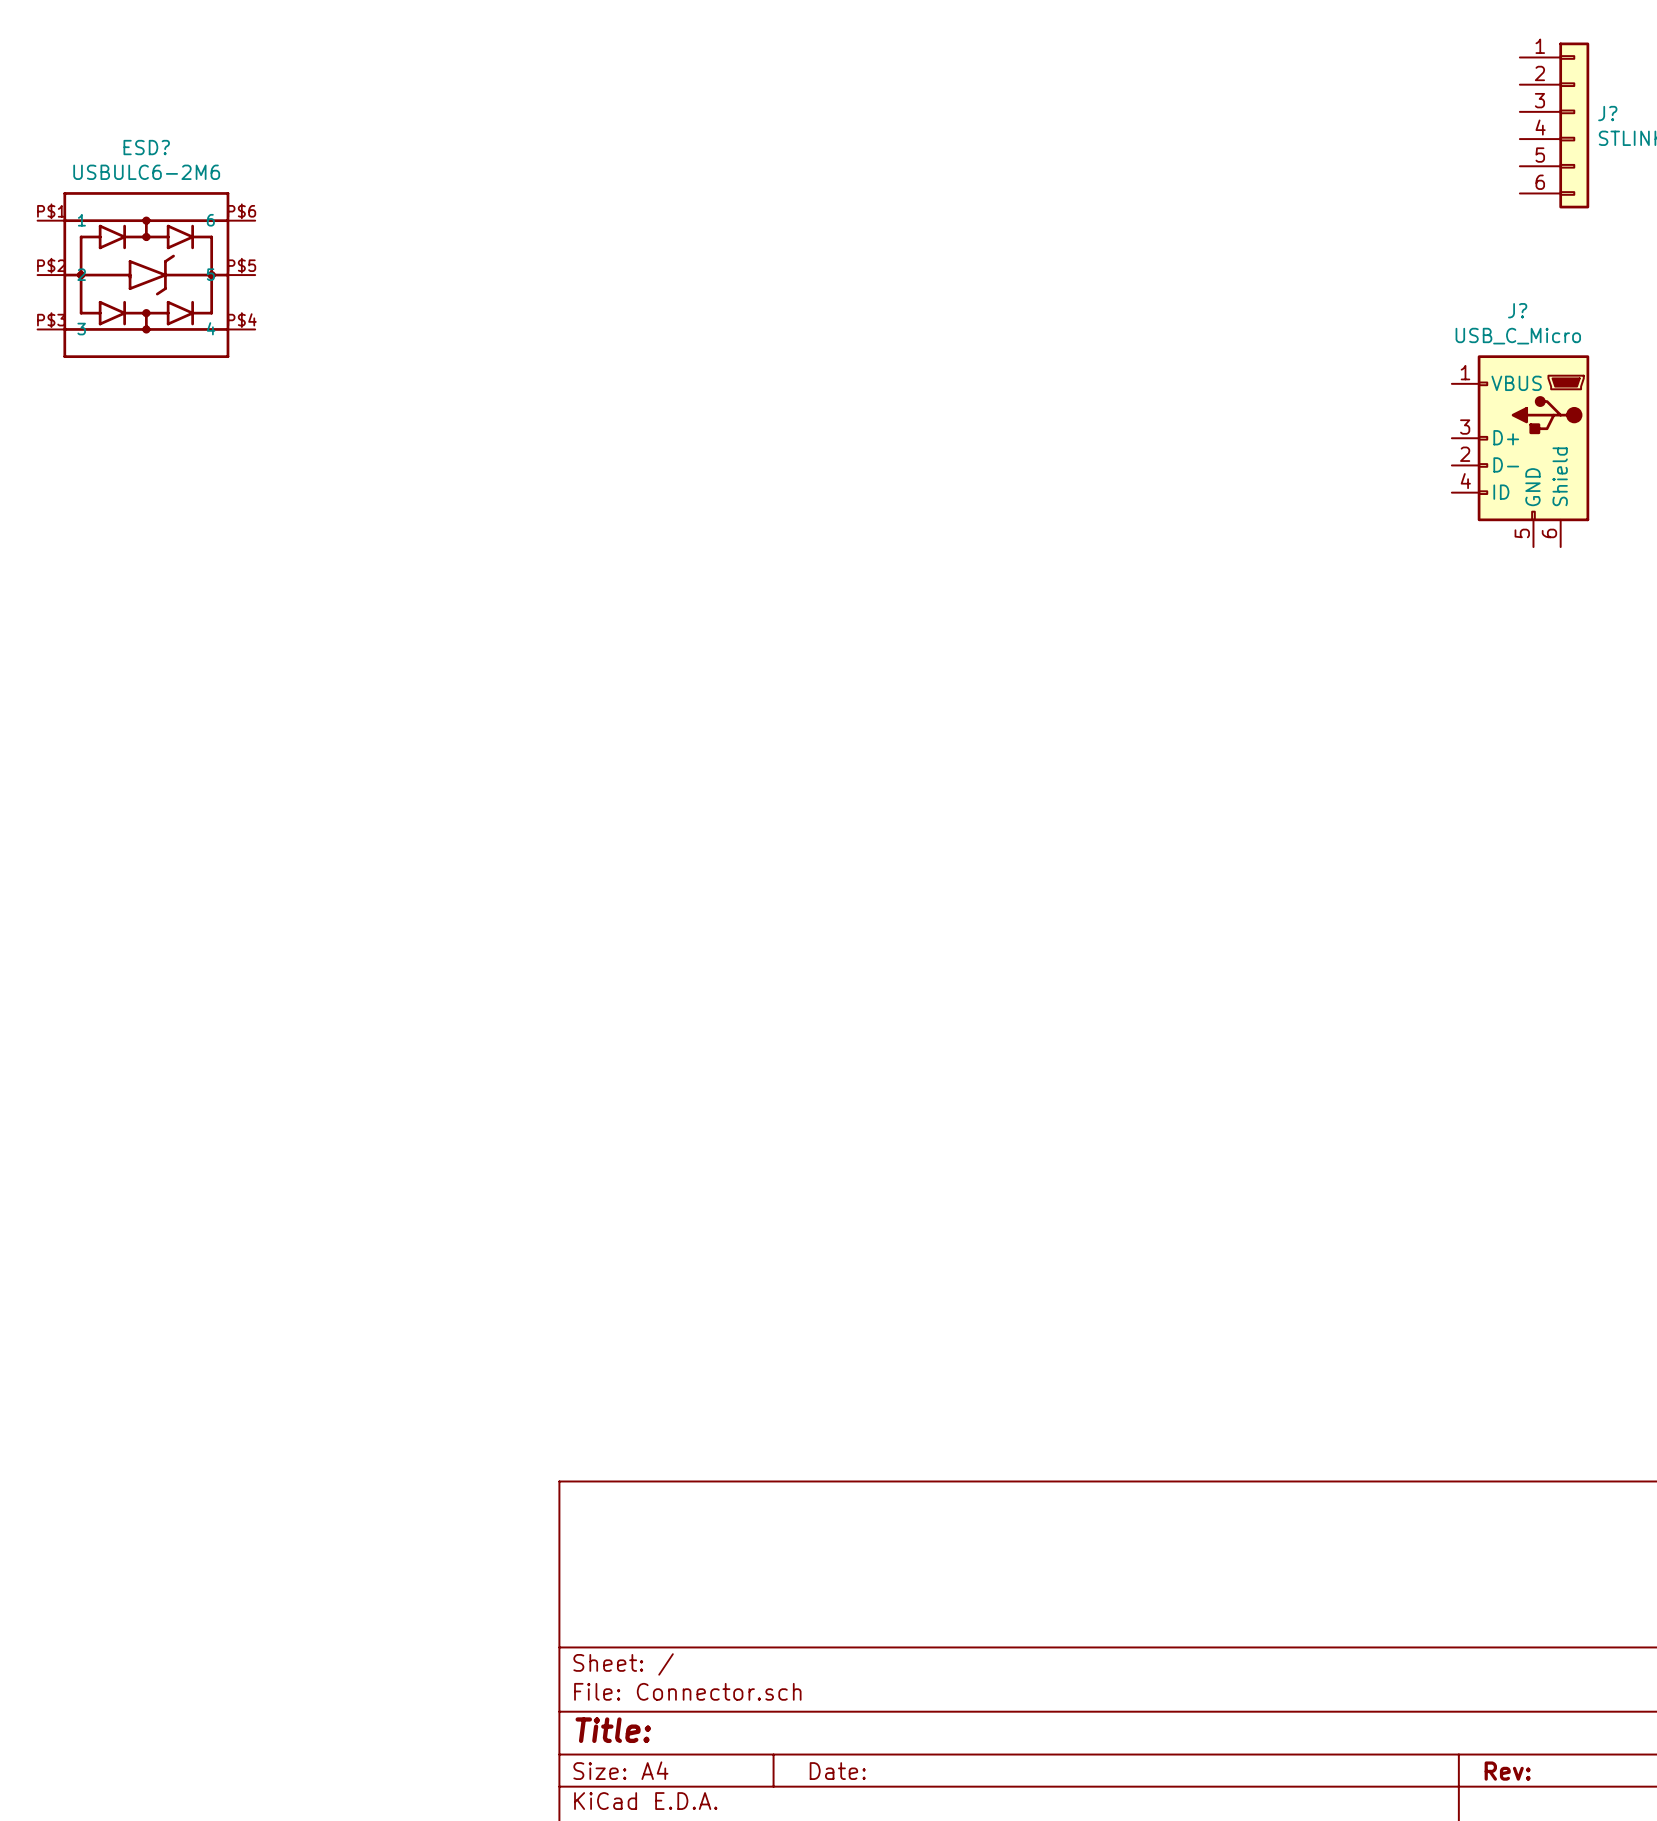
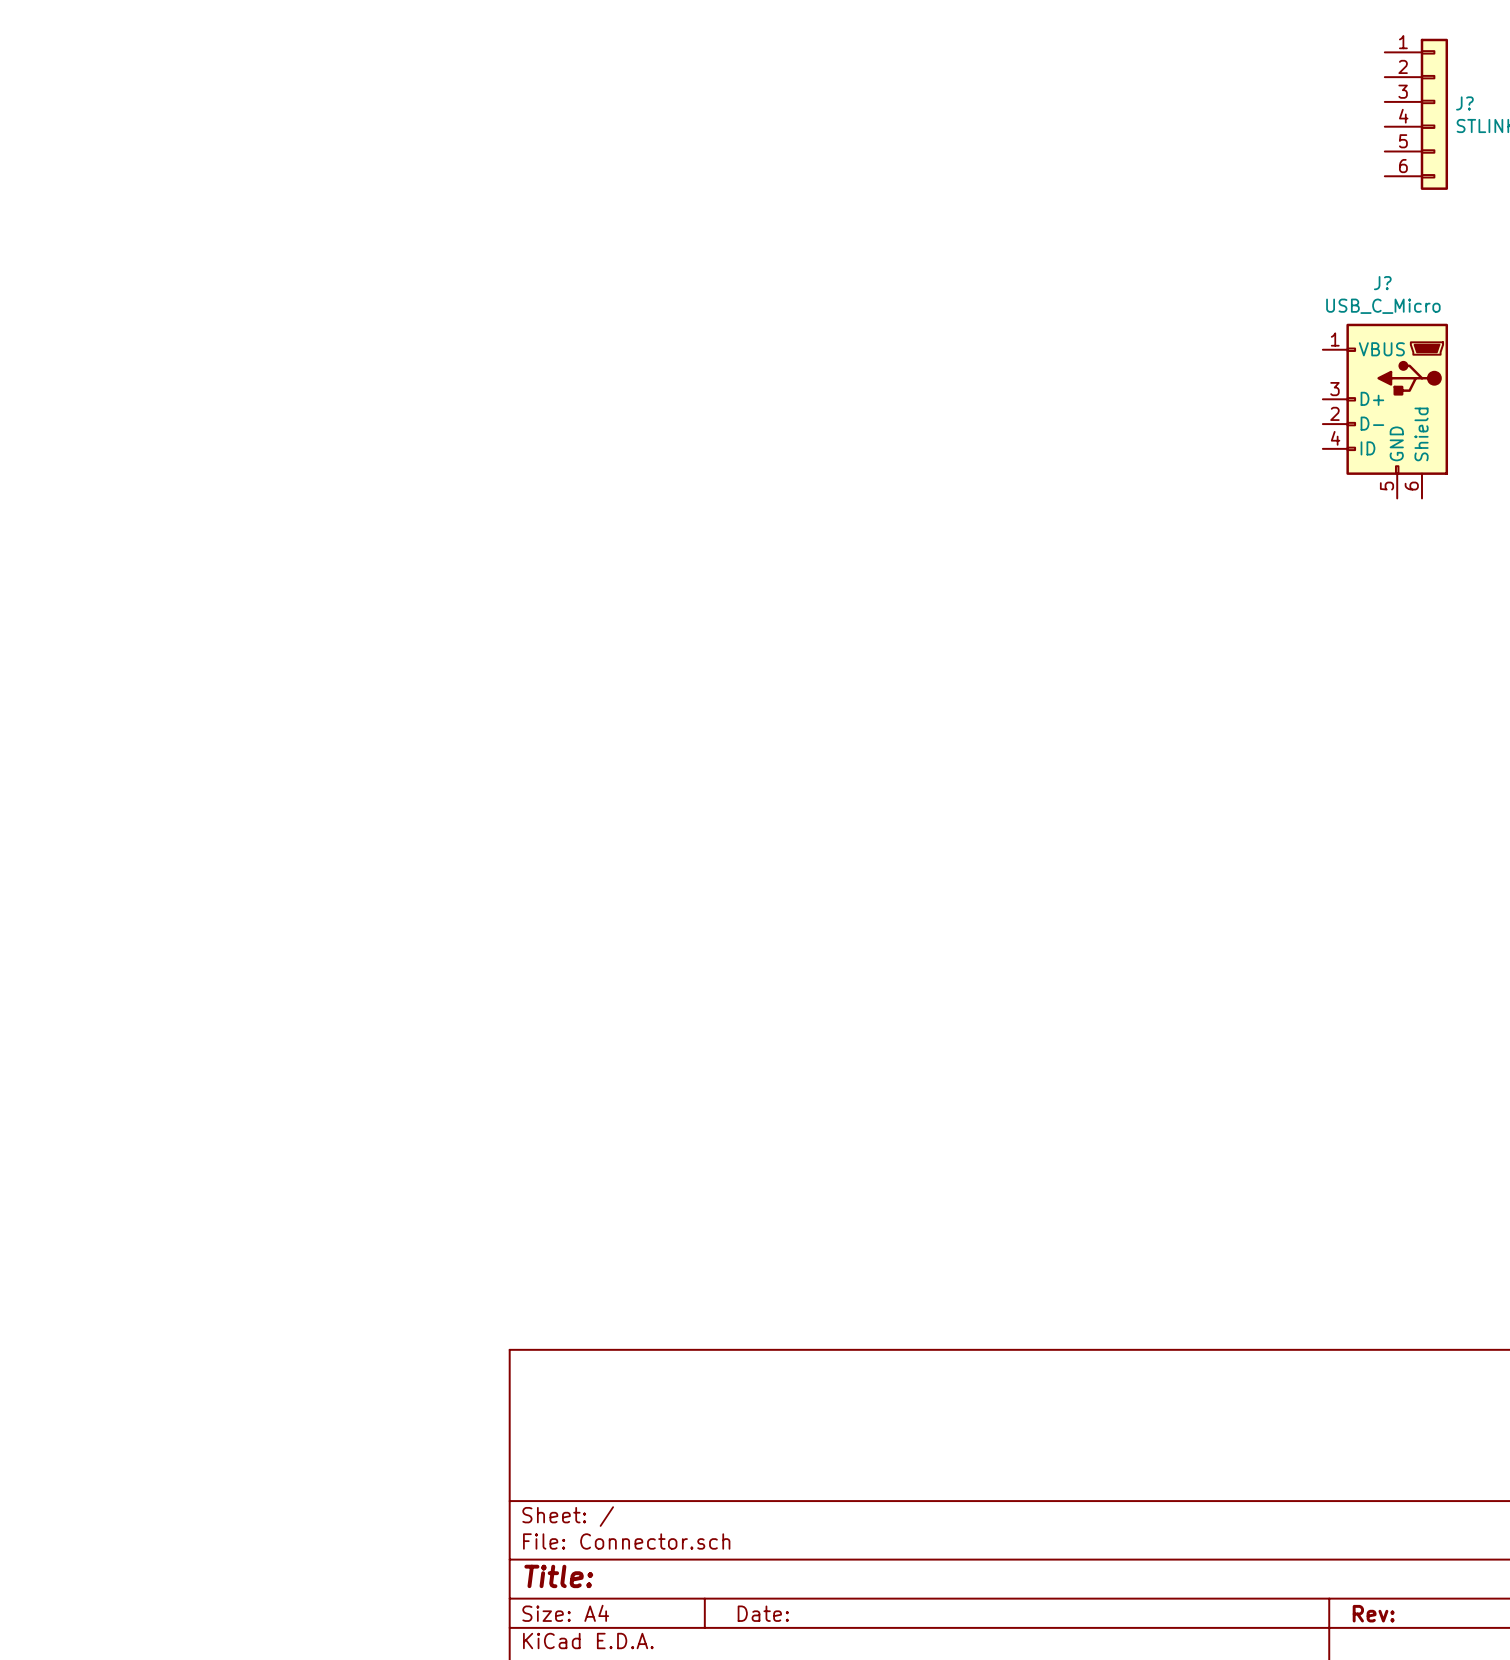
ESD?: USBULC6-2M6 (146, 275) -> none

